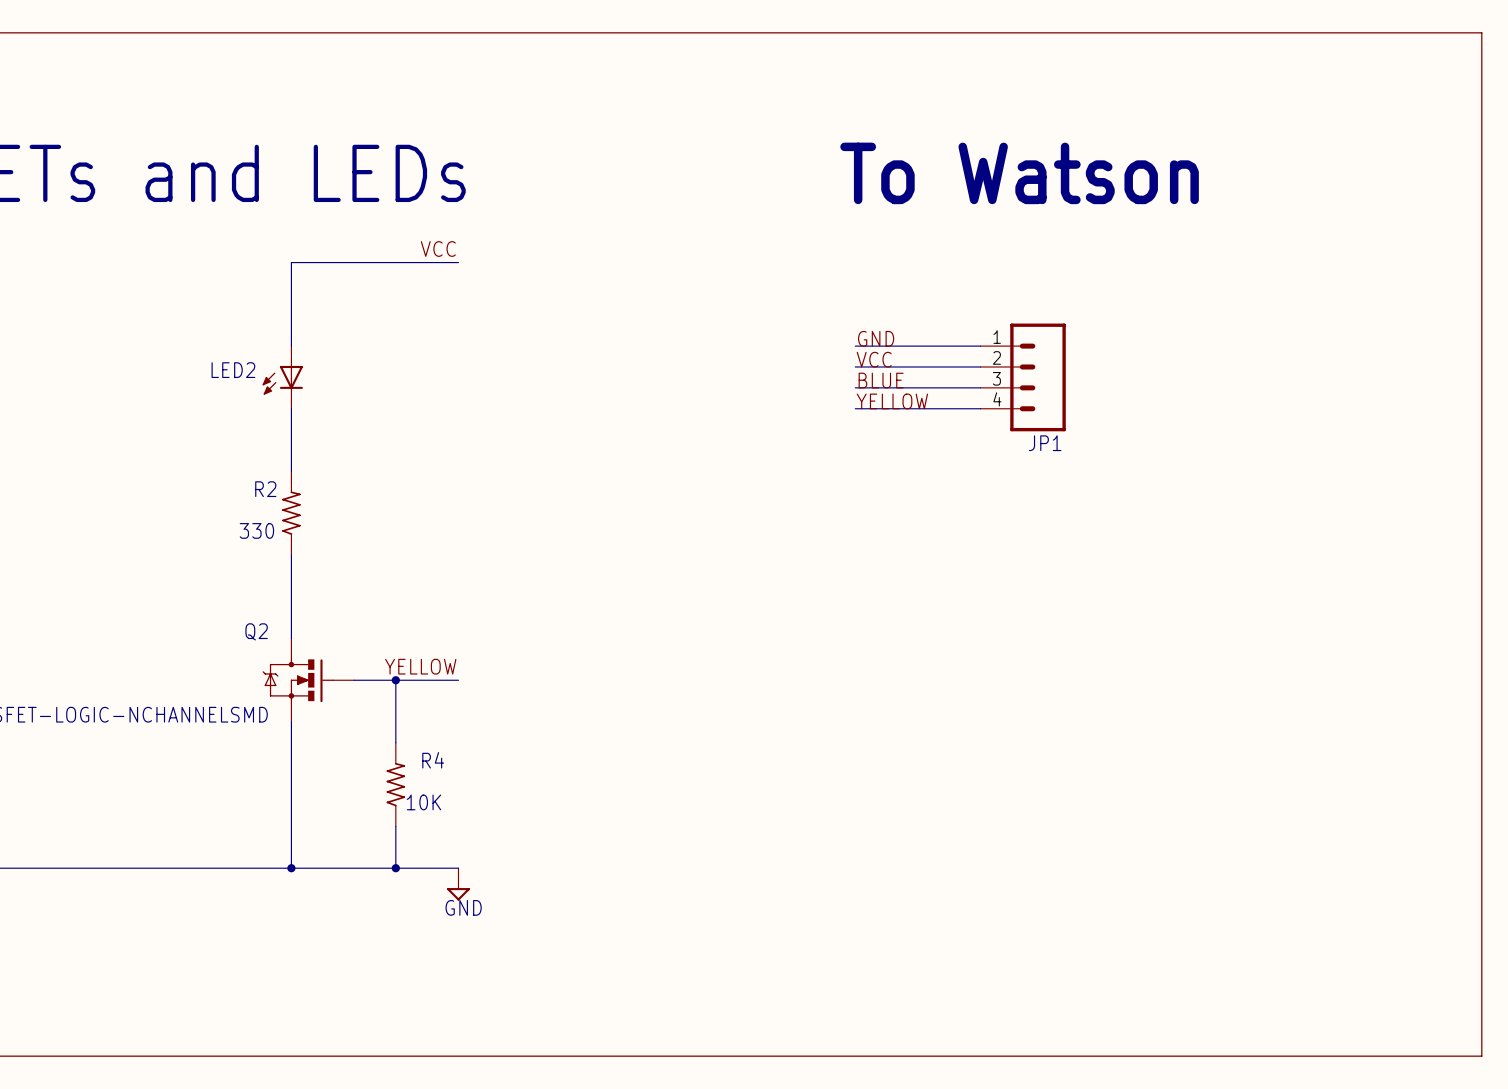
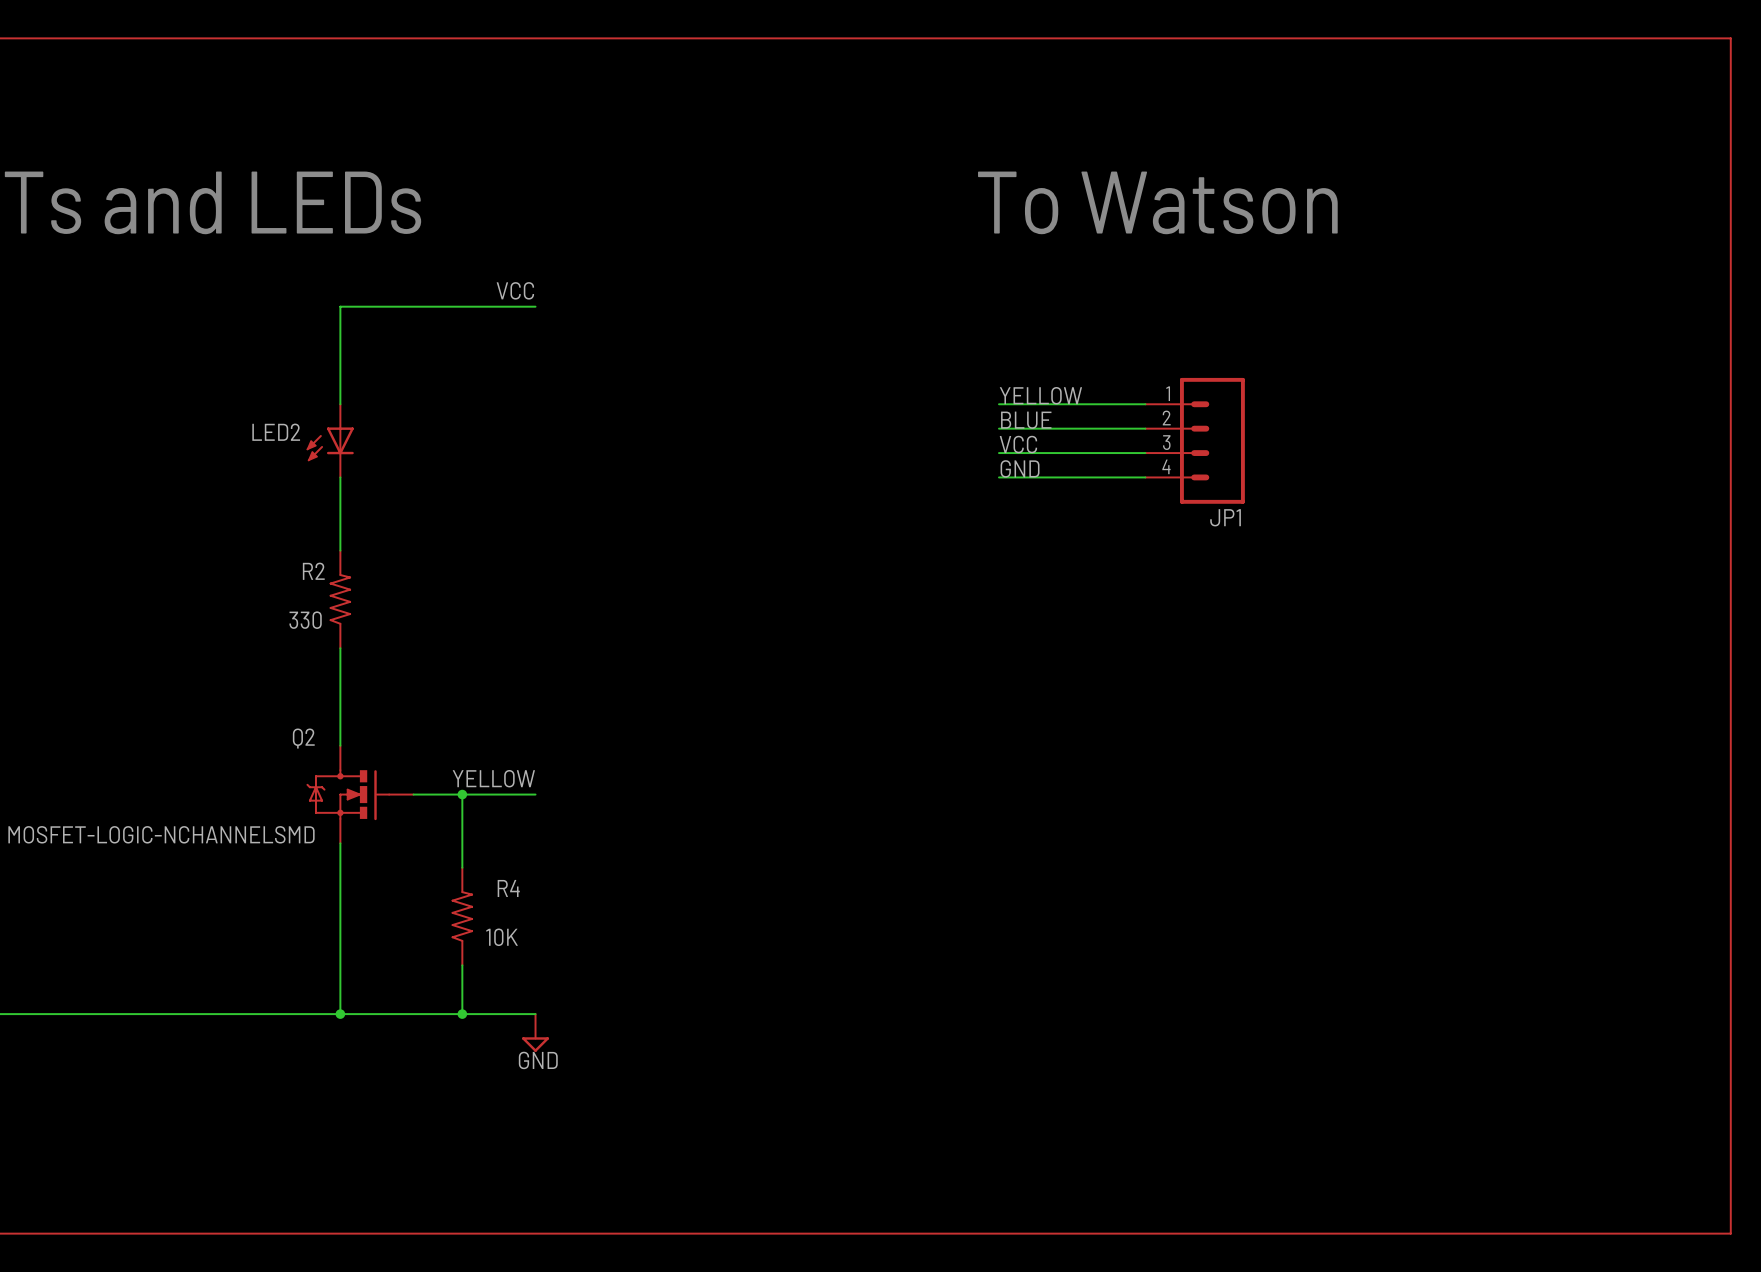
label: GND (876, 338) -> YELLOW (1040, 395)
label: VCC (874, 359) -> BLUE (1026, 420)
label: BLUE (881, 380) -> VCC (1018, 444)
label: YELLOW (892, 401) -> GND (1020, 468)

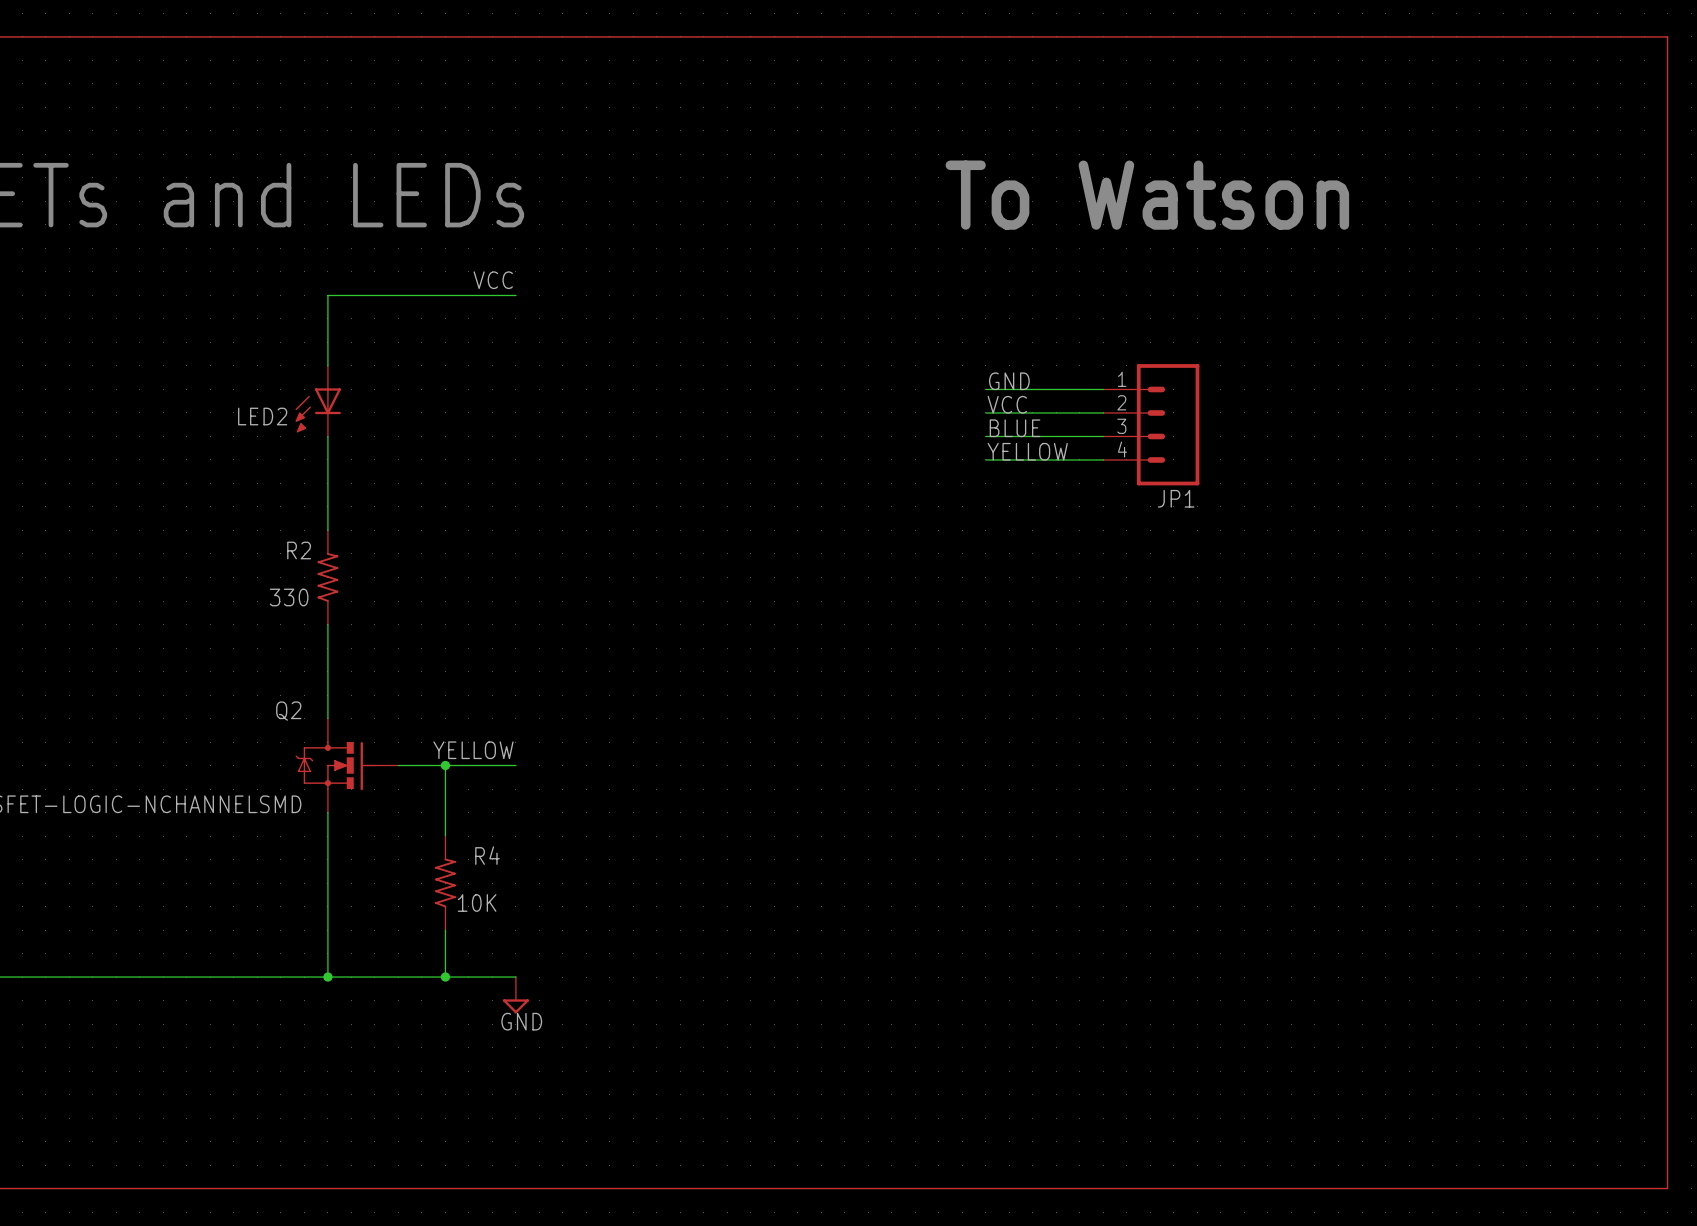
label position: YELLOW (1040, 395) -> YELLOW (1027, 451)
LED2 symbol: [306, 404, 354, 478] -> [295, 365, 341, 437]
wire: (998, 404) (1023, 404) -> none
label position: BLUE (1026, 420) -> BLUE (1015, 428)
wire: (998, 428) (1023, 428) -> none
label position: VCC (1018, 444) -> VCC (1007, 404)
wire: (998, 453) (1023, 453) -> none
label position: GND (1020, 468) -> GND (1009, 381)
wire: (998, 477) (1023, 477) -> none

